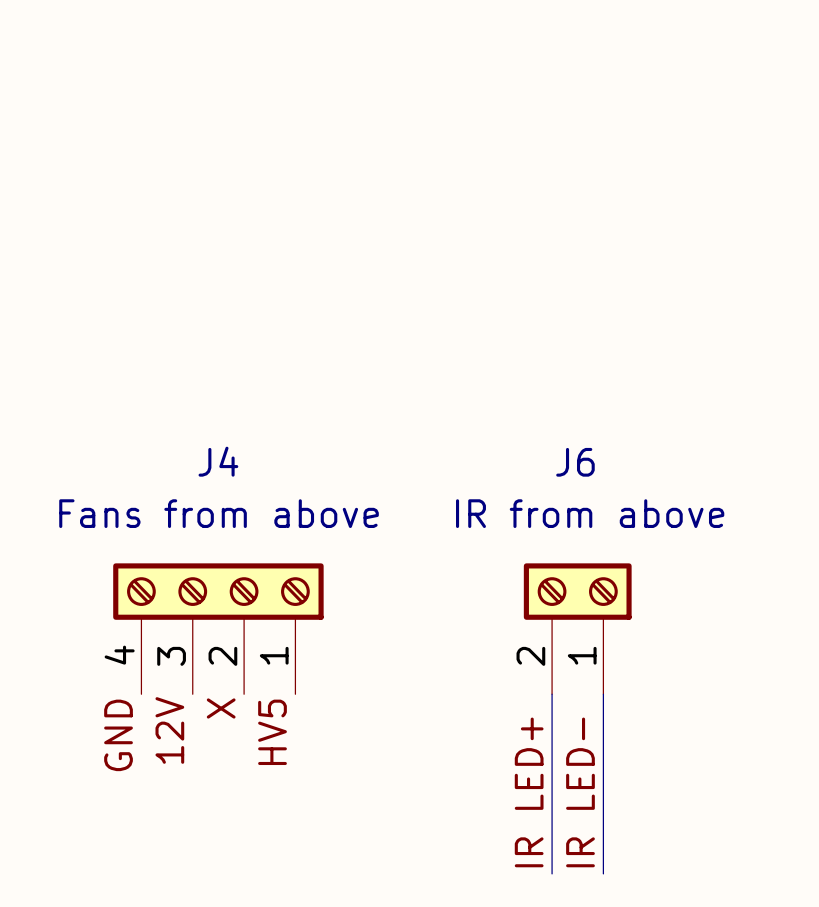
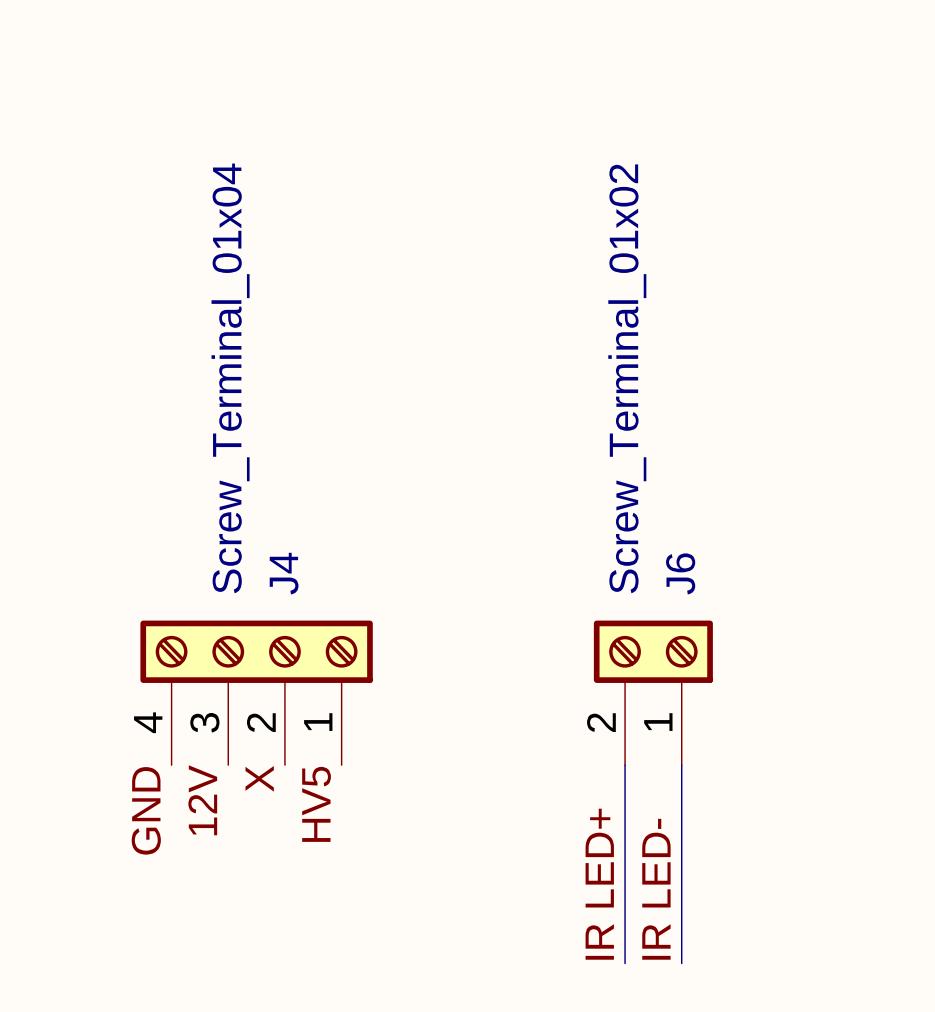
J4 name rotation: 0° (218, 461) -> 90° counterclockwise (284, 573)
J6 name rotation: 0° (575, 462) -> 90° counterclockwise (680, 573)
J4 value: Fans from above (219, 513) -> Screw_Terminal_01x04 (230, 378)
J6 value: IR from above (590, 513) -> Screw_Terminal_01x02 (627, 378)

